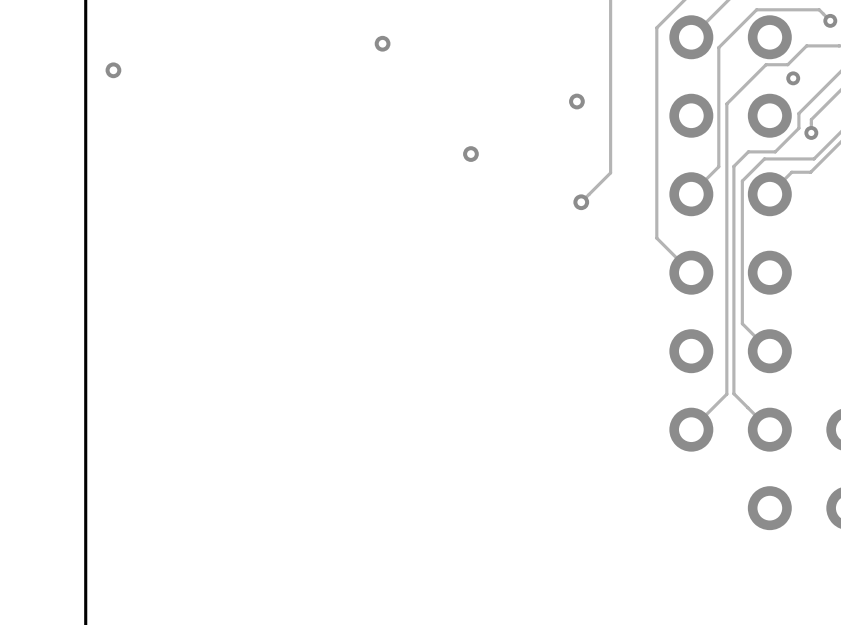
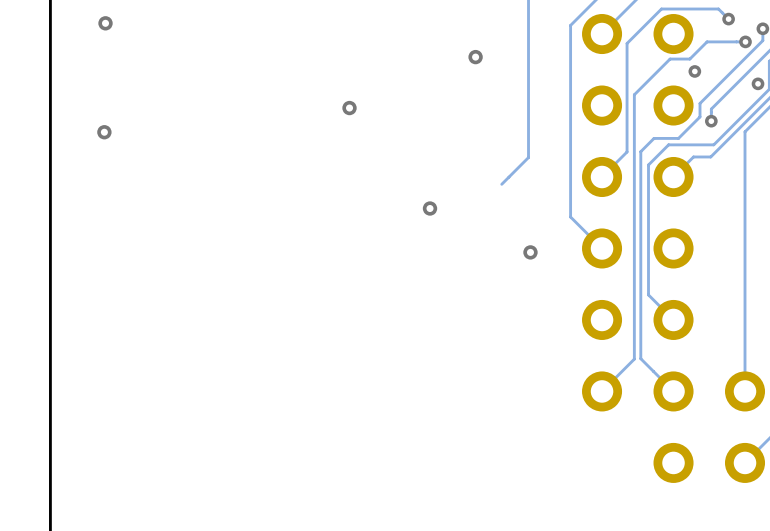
via: none -> (105, 23)
via: (382, 43) -> none
via: none -> (475, 57)
via: (113, 70) -> none
via: (576, 101) -> none
via: none -> (349, 108)
via: none -> (104, 132)
via: (470, 154) -> none
via: (581, 202) -> none
via: none -> (430, 208)
via: none -> (530, 252)

